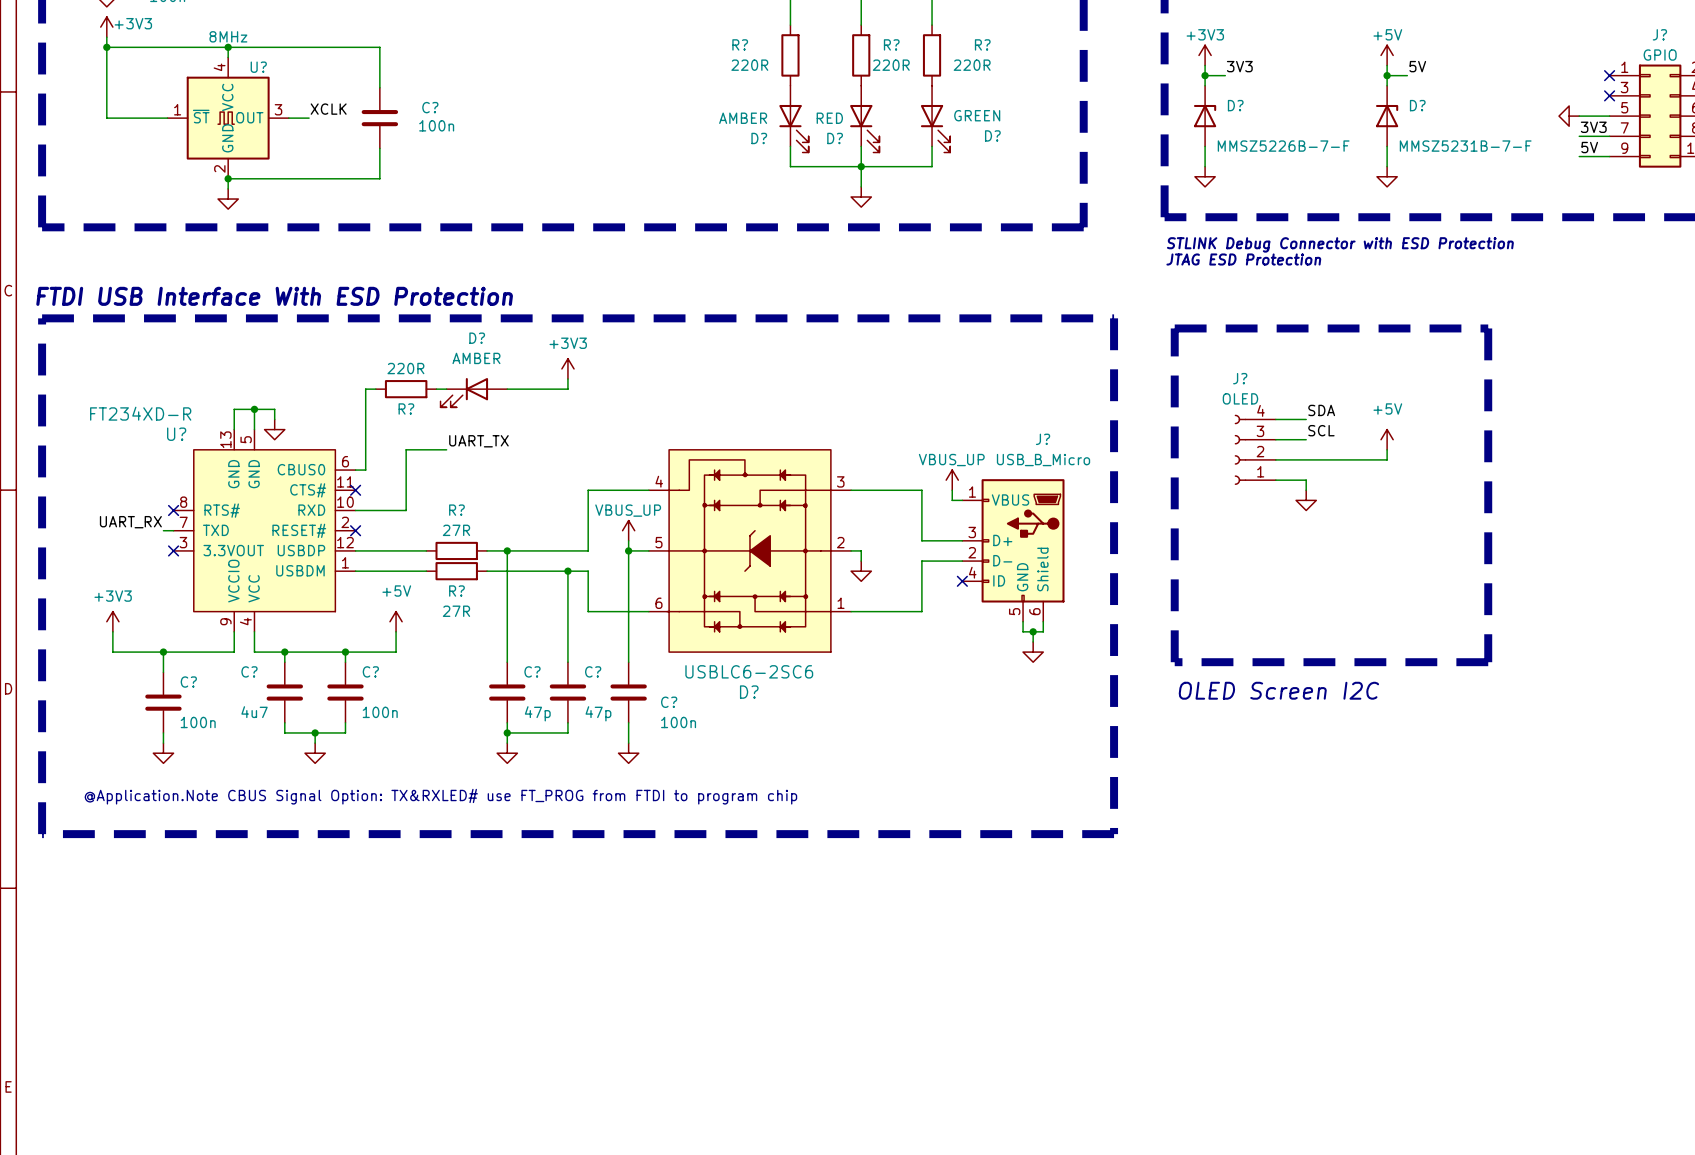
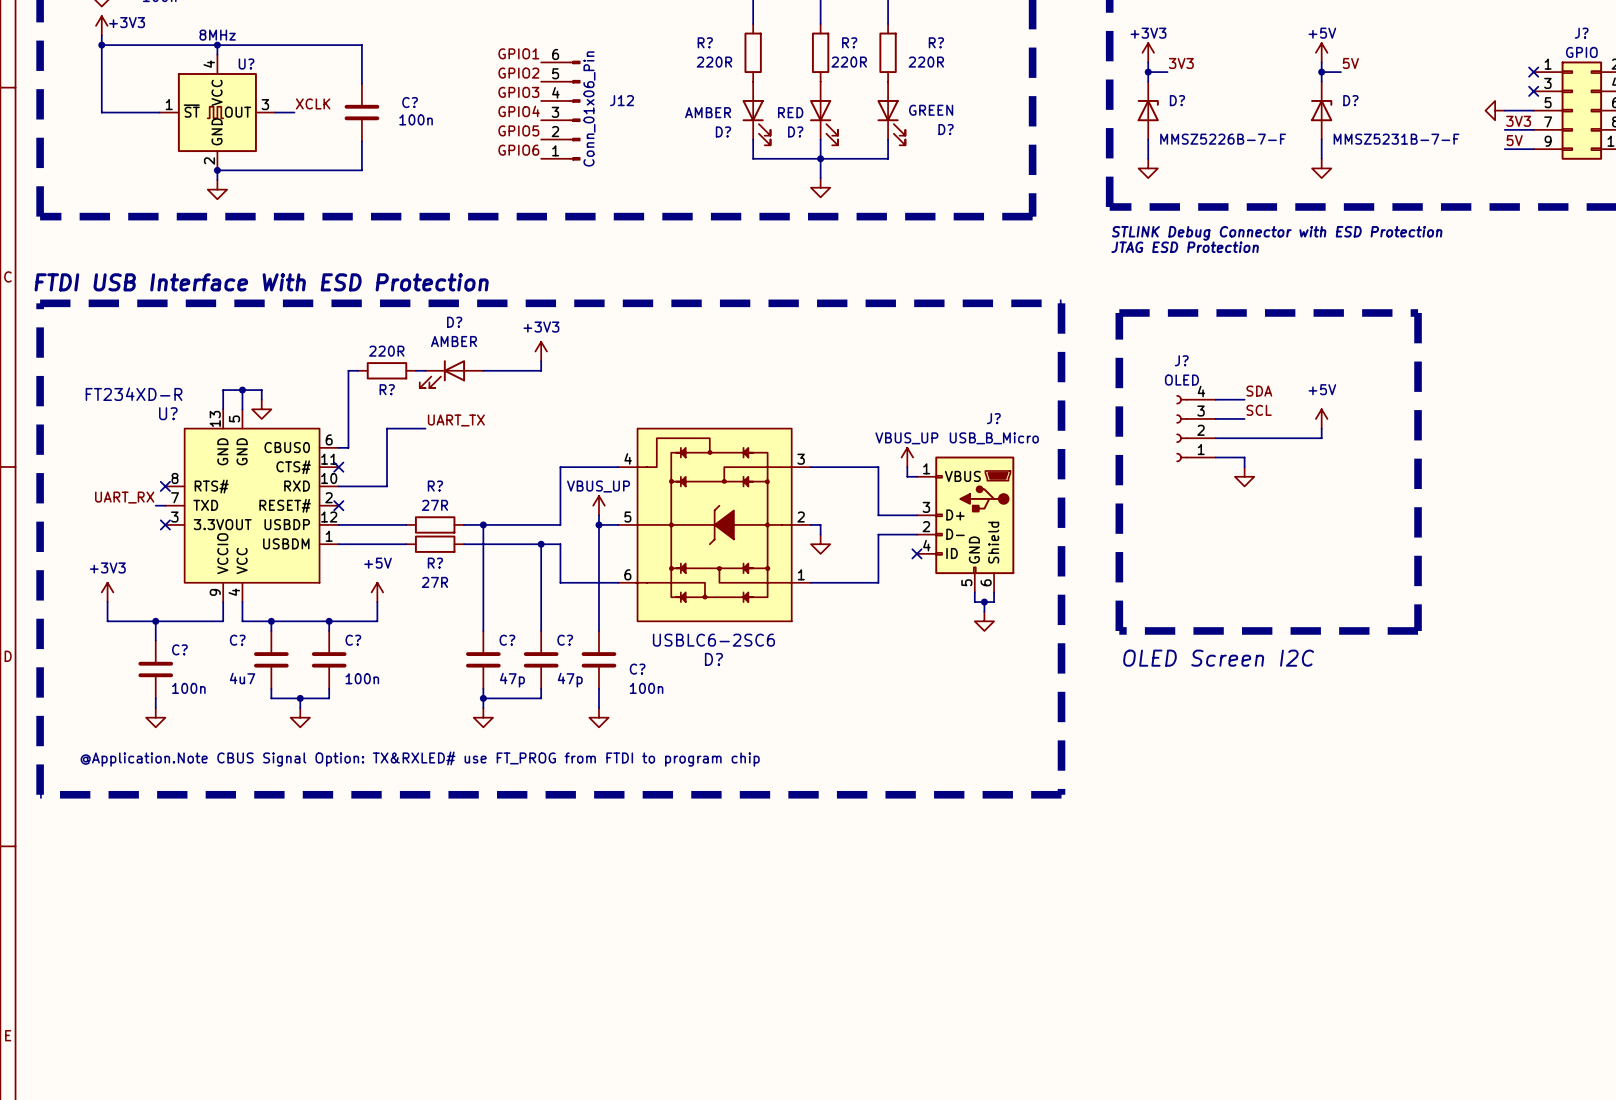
label: none -> GPIO1 (518, 53)
label: none -> GPIO2 (518, 73)
label: none -> GPIO3 (518, 92)
label: none -> GPIO4 (519, 111)
J12: none -> Conn_01x06_Pin (560, 110)
label: none -> GPIO5 (518, 130)
label: none -> GPIO6 (518, 150)

